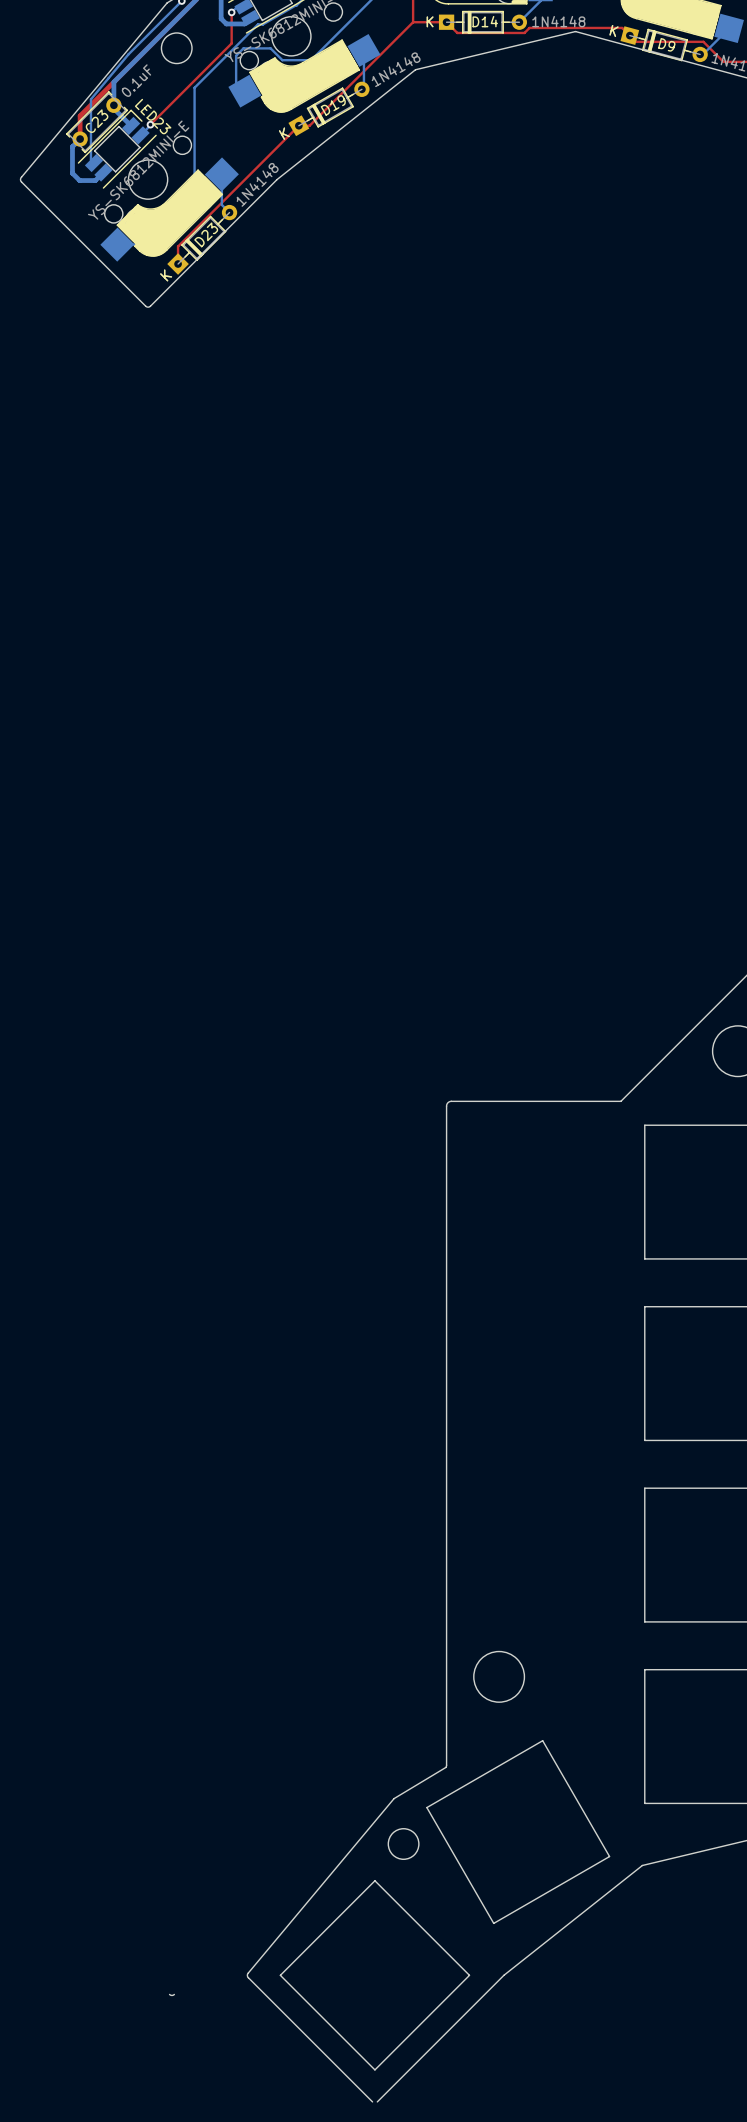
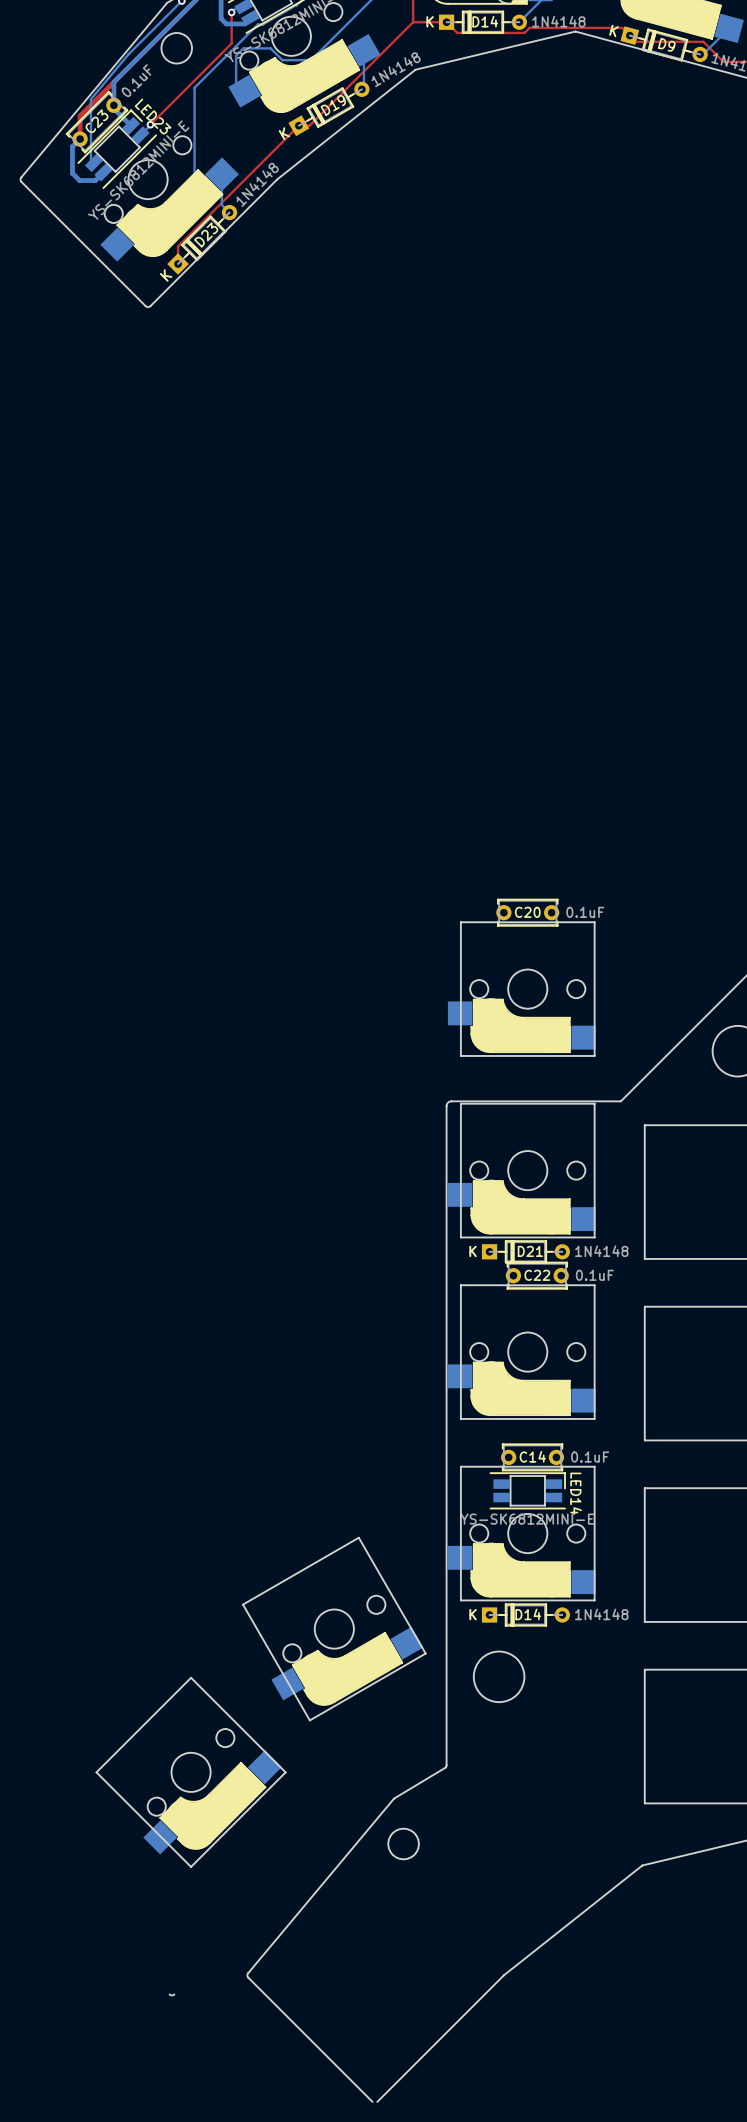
C20: none -> 0.1uF (527, 912)
drawing: none -> [460, 921, 596, 1057]
part: none -> (521, 1011)
drawing: none -> [460, 1103, 596, 1239]
part: none -> (521, 1192)
D21: none -> 1N4148 (525, 1251)
C22: none -> 0.1uF (537, 1275)
drawing: none -> [460, 1284, 596, 1420]
part: none -> (521, 1374)
C14: none -> 0.1uF (532, 1457)
drawing: none -> [460, 1466, 596, 1602]
LED14: none -> YS-SK6812MINI-E (527, 1490)
drawing: none -> [95, 1537, 427, 1868]
part: none -> (521, 1555)
D14: none -> 1N4148 (525, 1614)
part: none -> (347, 1650)
drawing: [279, 1740, 611, 2071] -> none
part: none -> (212, 1791)

